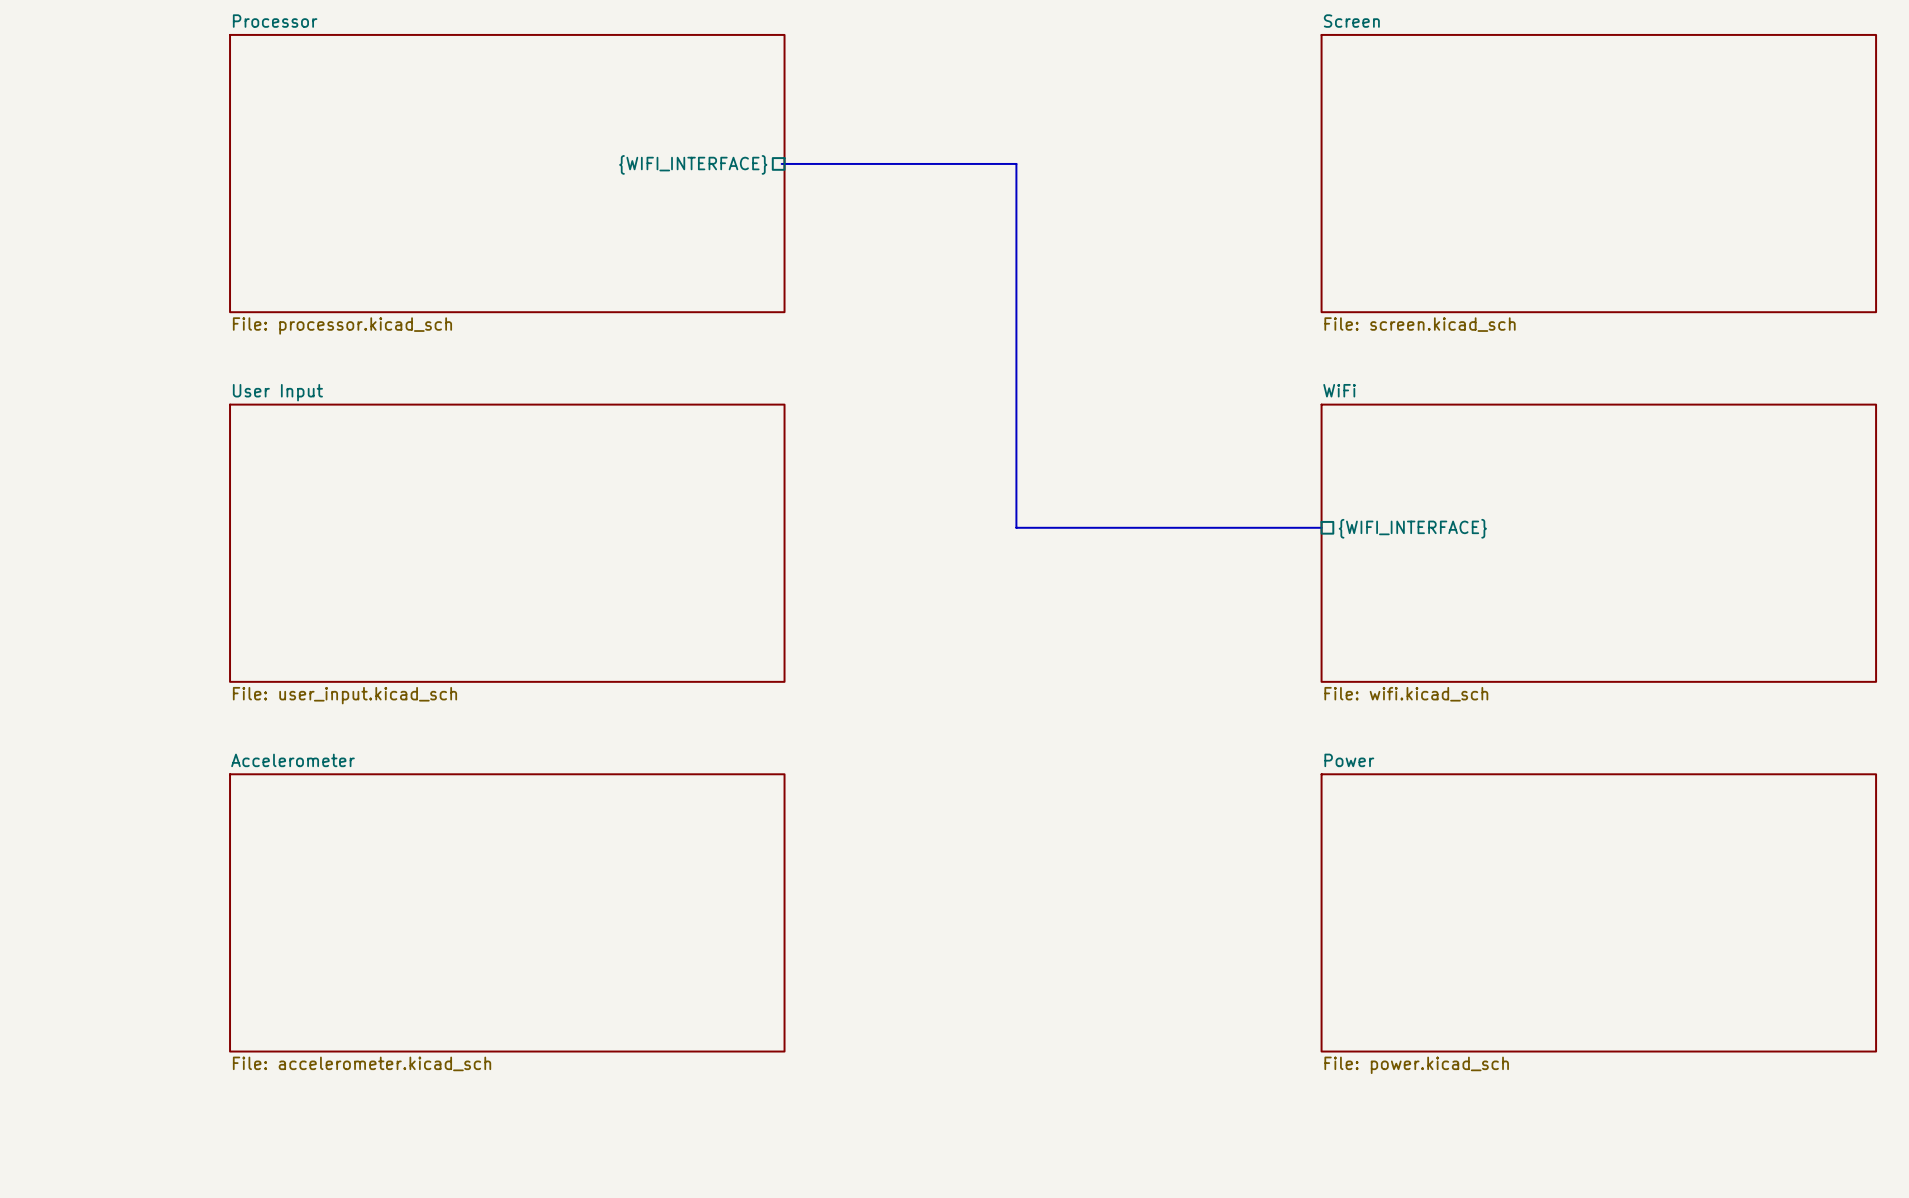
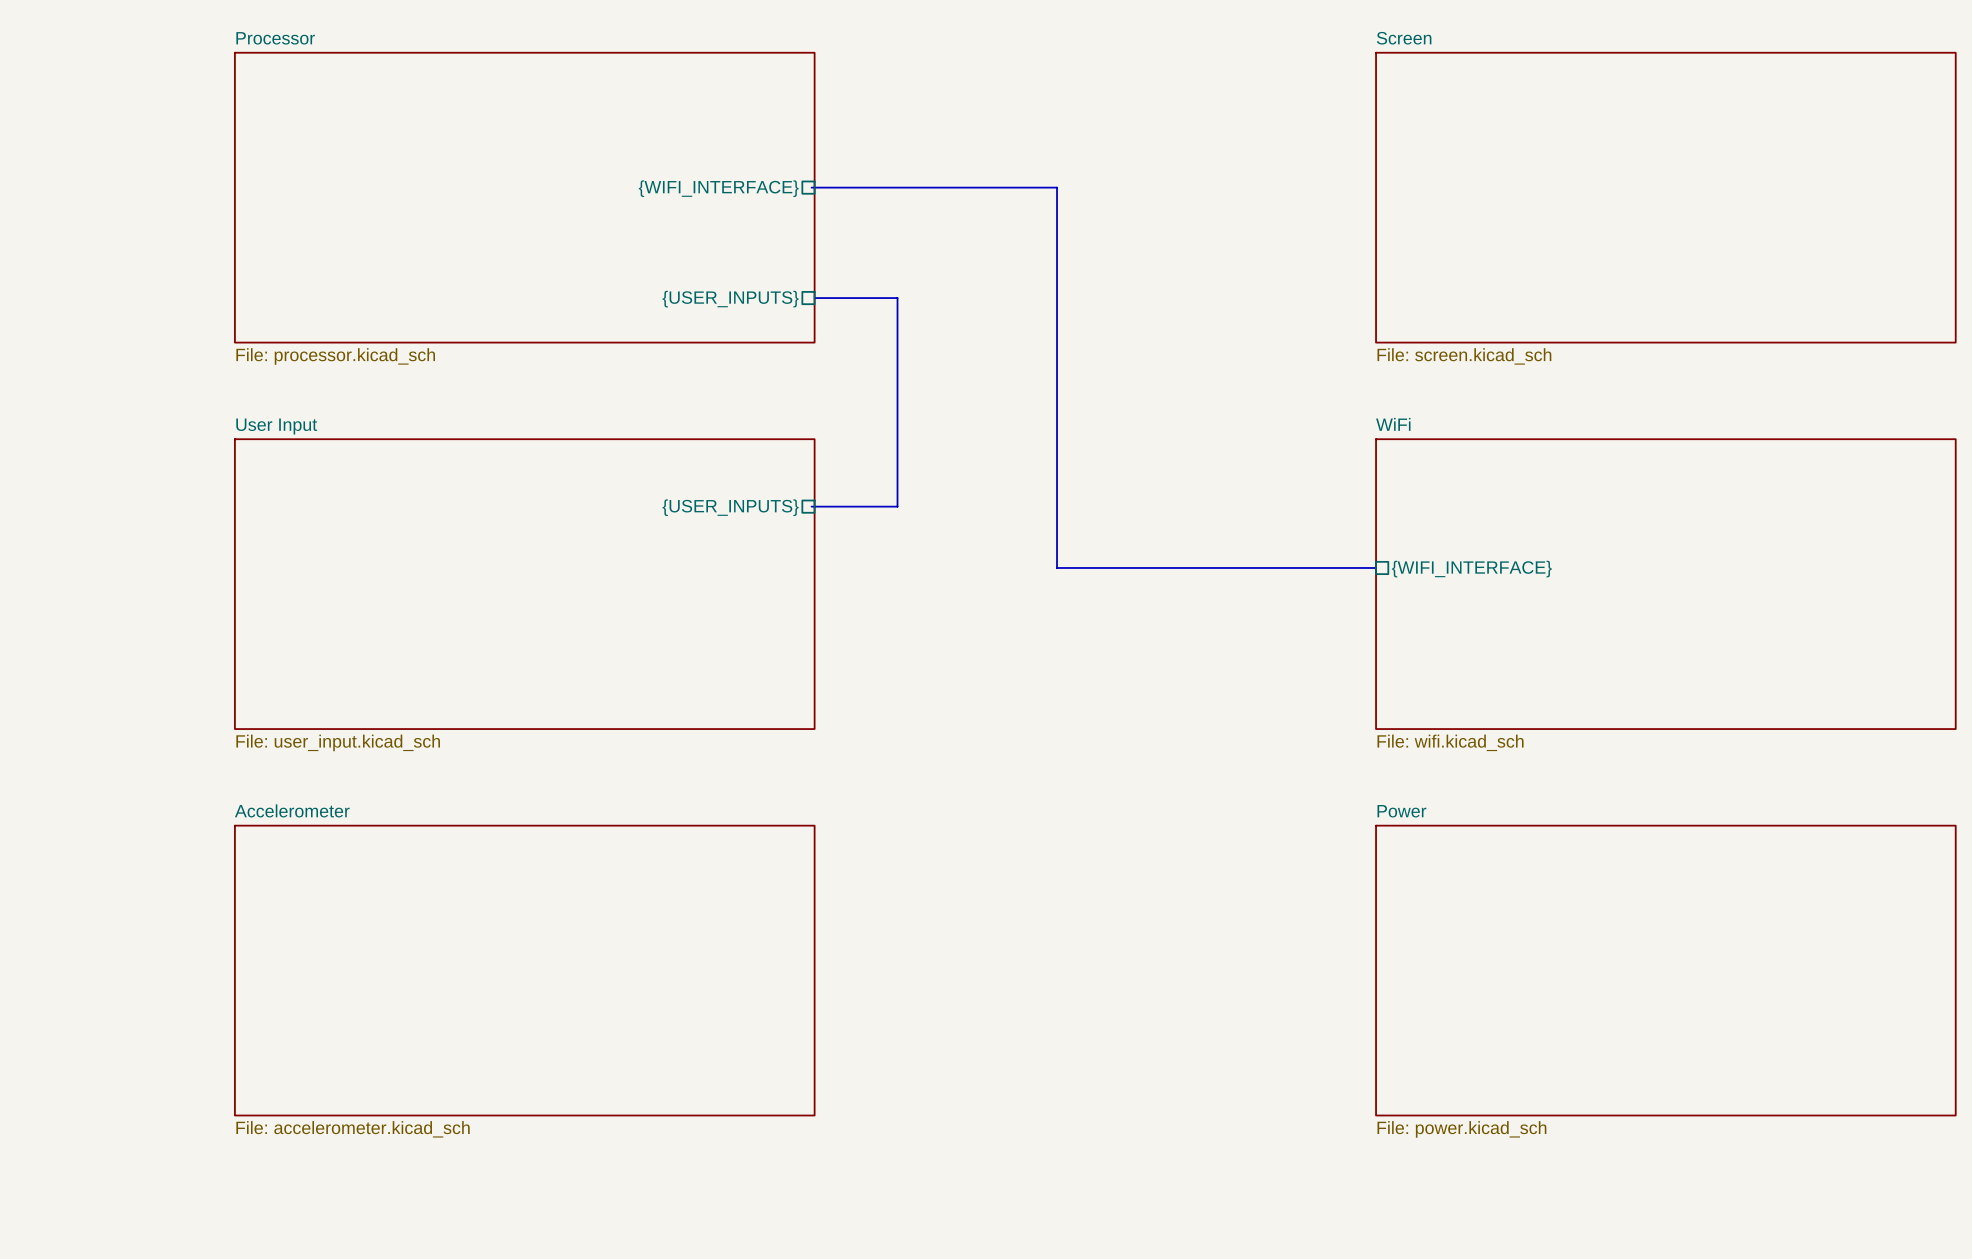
bus: none -> (814, 298) (897, 298) (897, 506) (811, 506)
sheet pin: none -> {USER_INPUTS} (730, 299)
sheet pin: none -> {USER_INPUTS} (730, 507)

